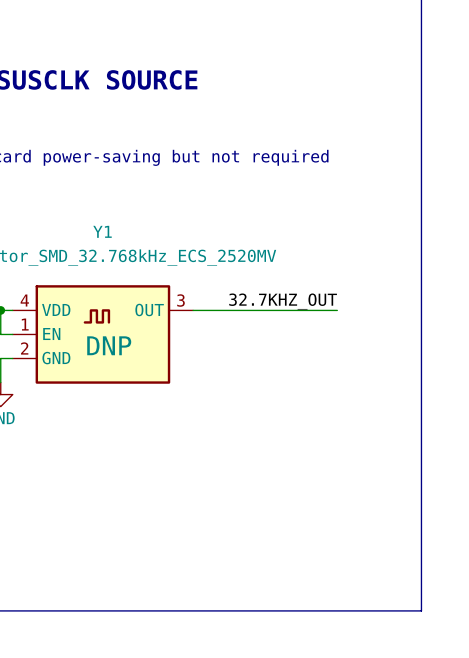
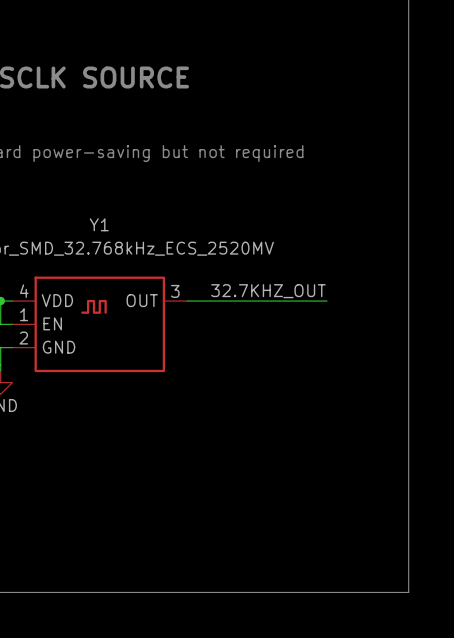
Y1 text: DNP (109, 345) -> none

